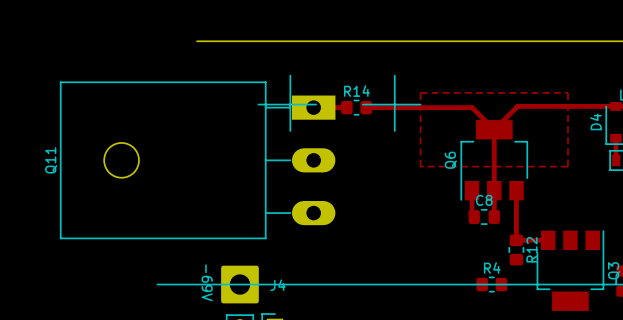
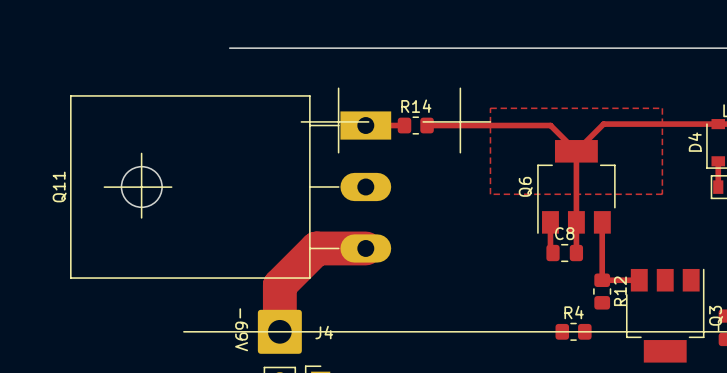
line: none -> (141, 153) (141, 217)
line: none -> (104, 187) (171, 187)
track: none -> (365, 248) (316, 248) (279, 285) (279, 331)

